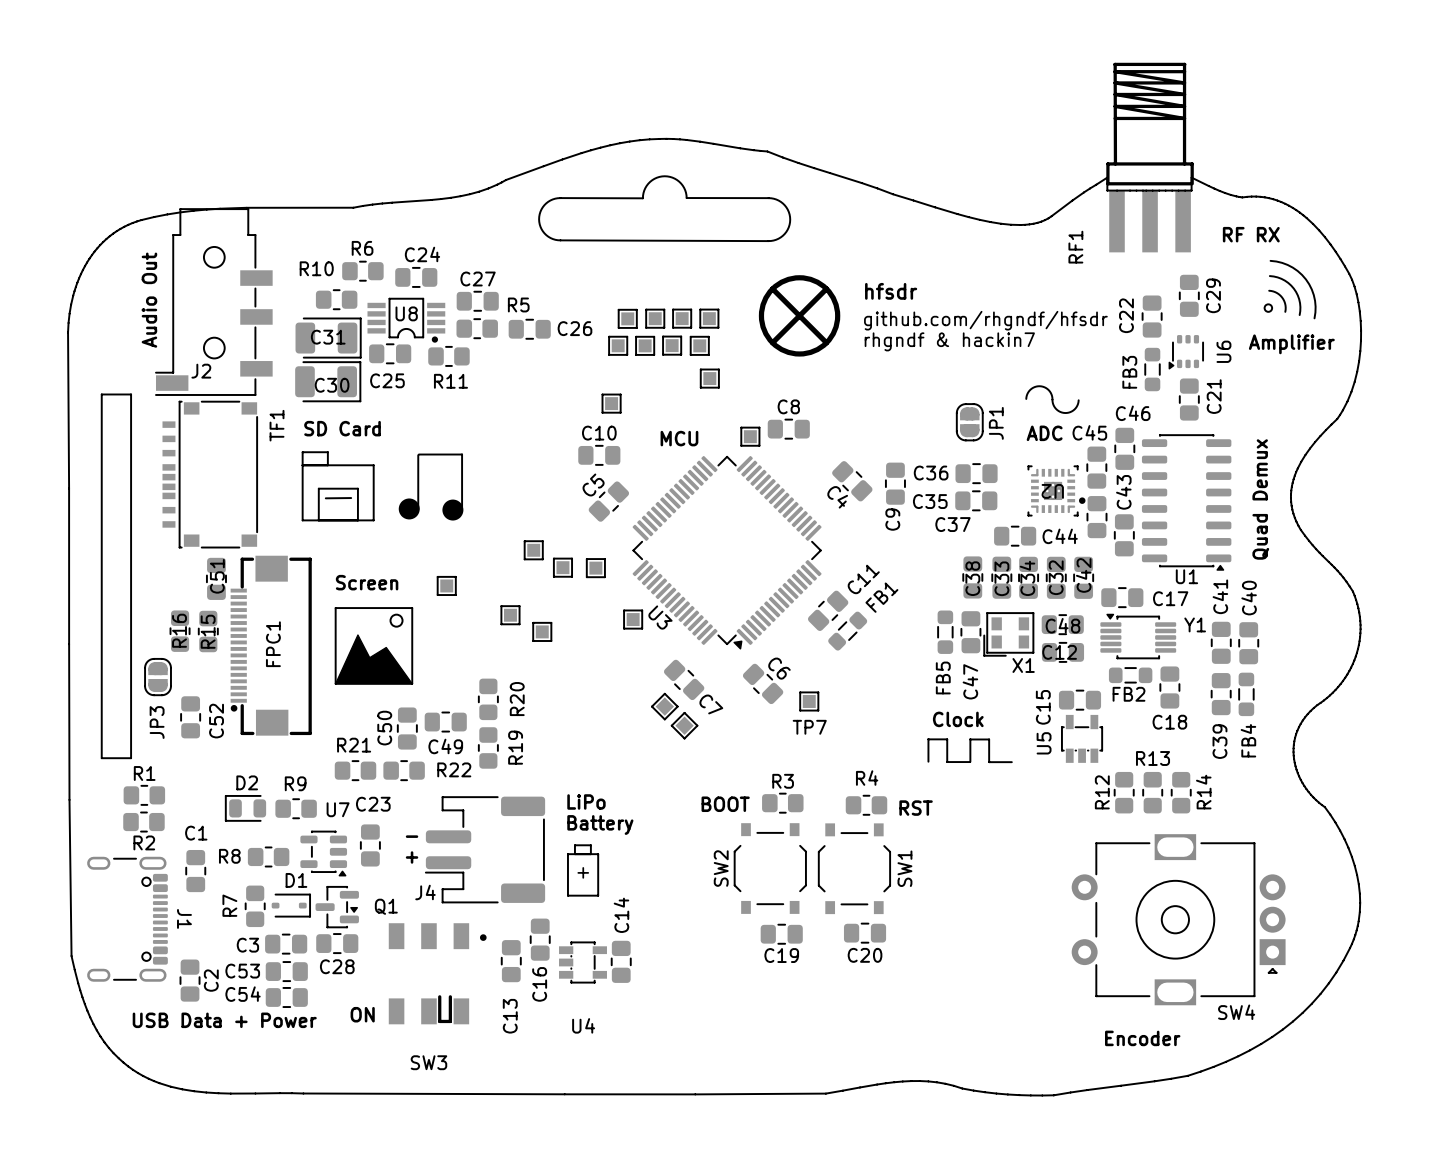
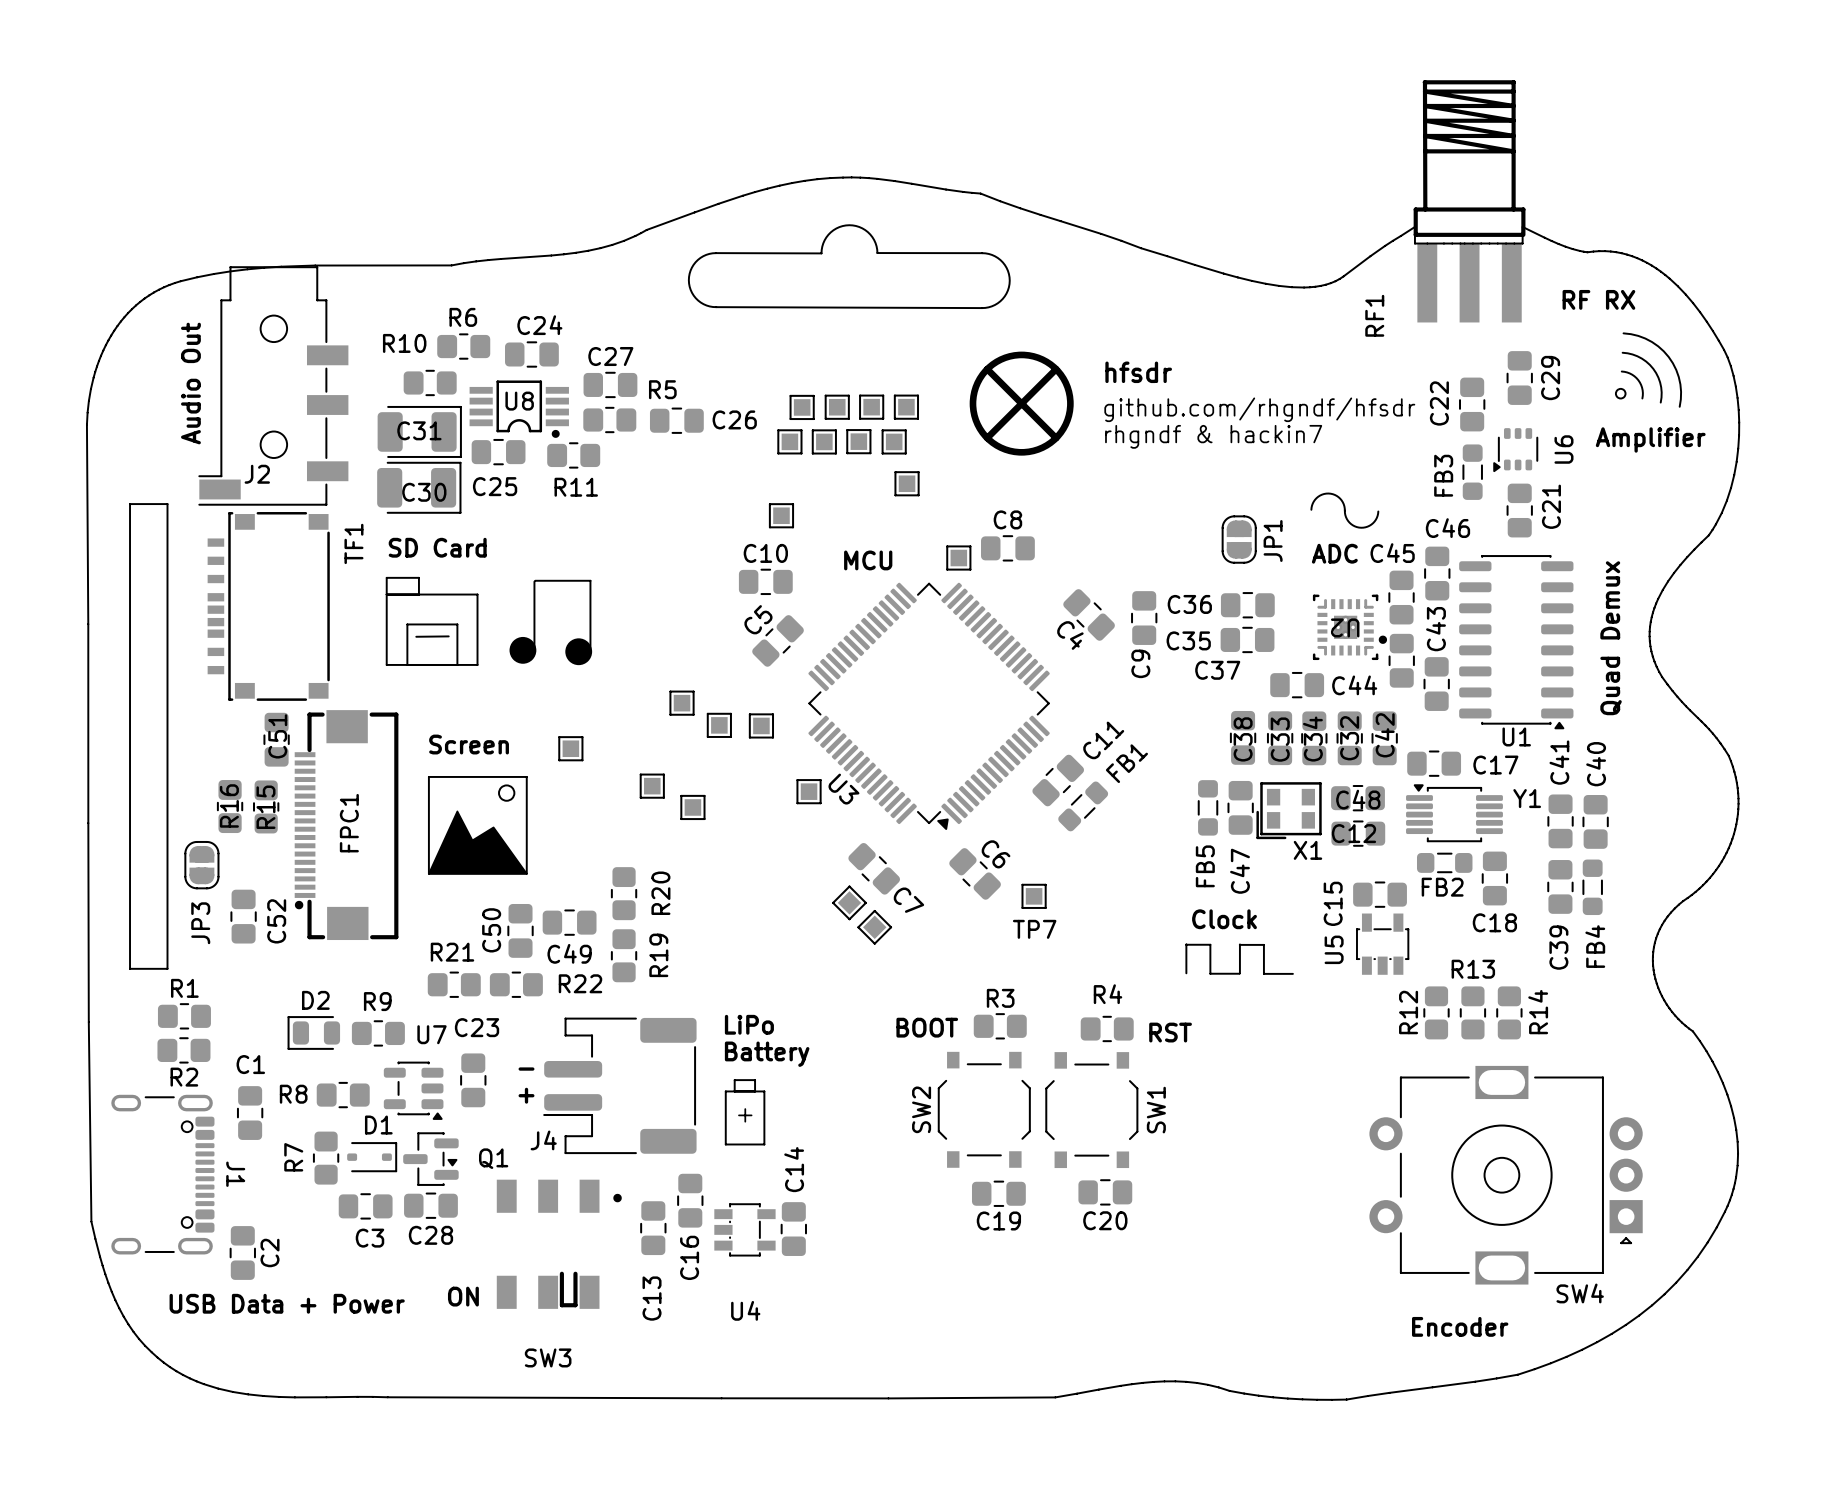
C3 name position: C3 (247, 945) -> C3 (369, 1238)
C53: (286, 971) -> none
C54: (286, 997) -> none

